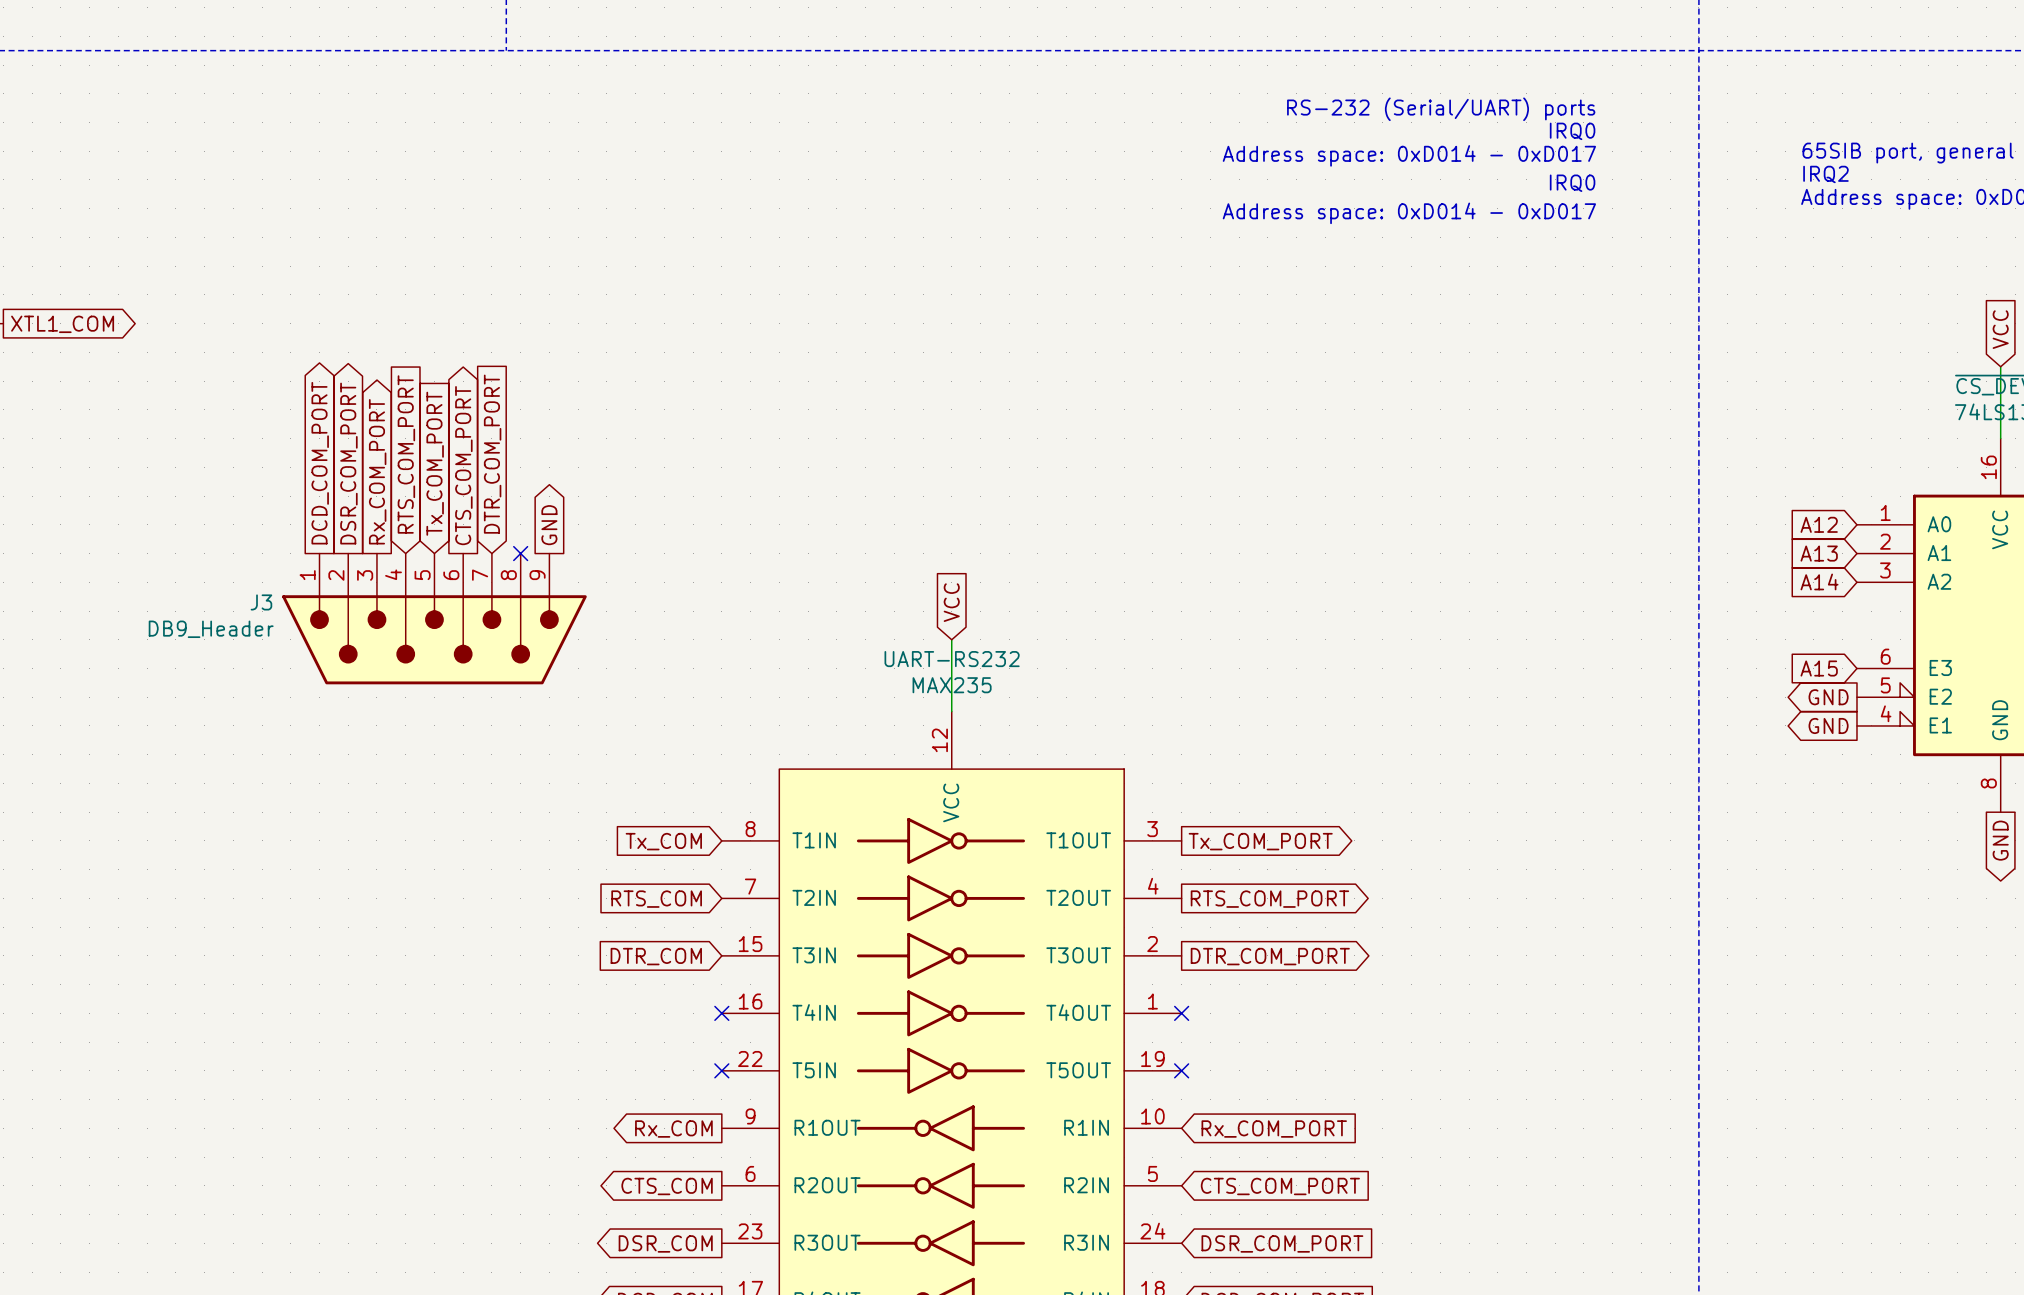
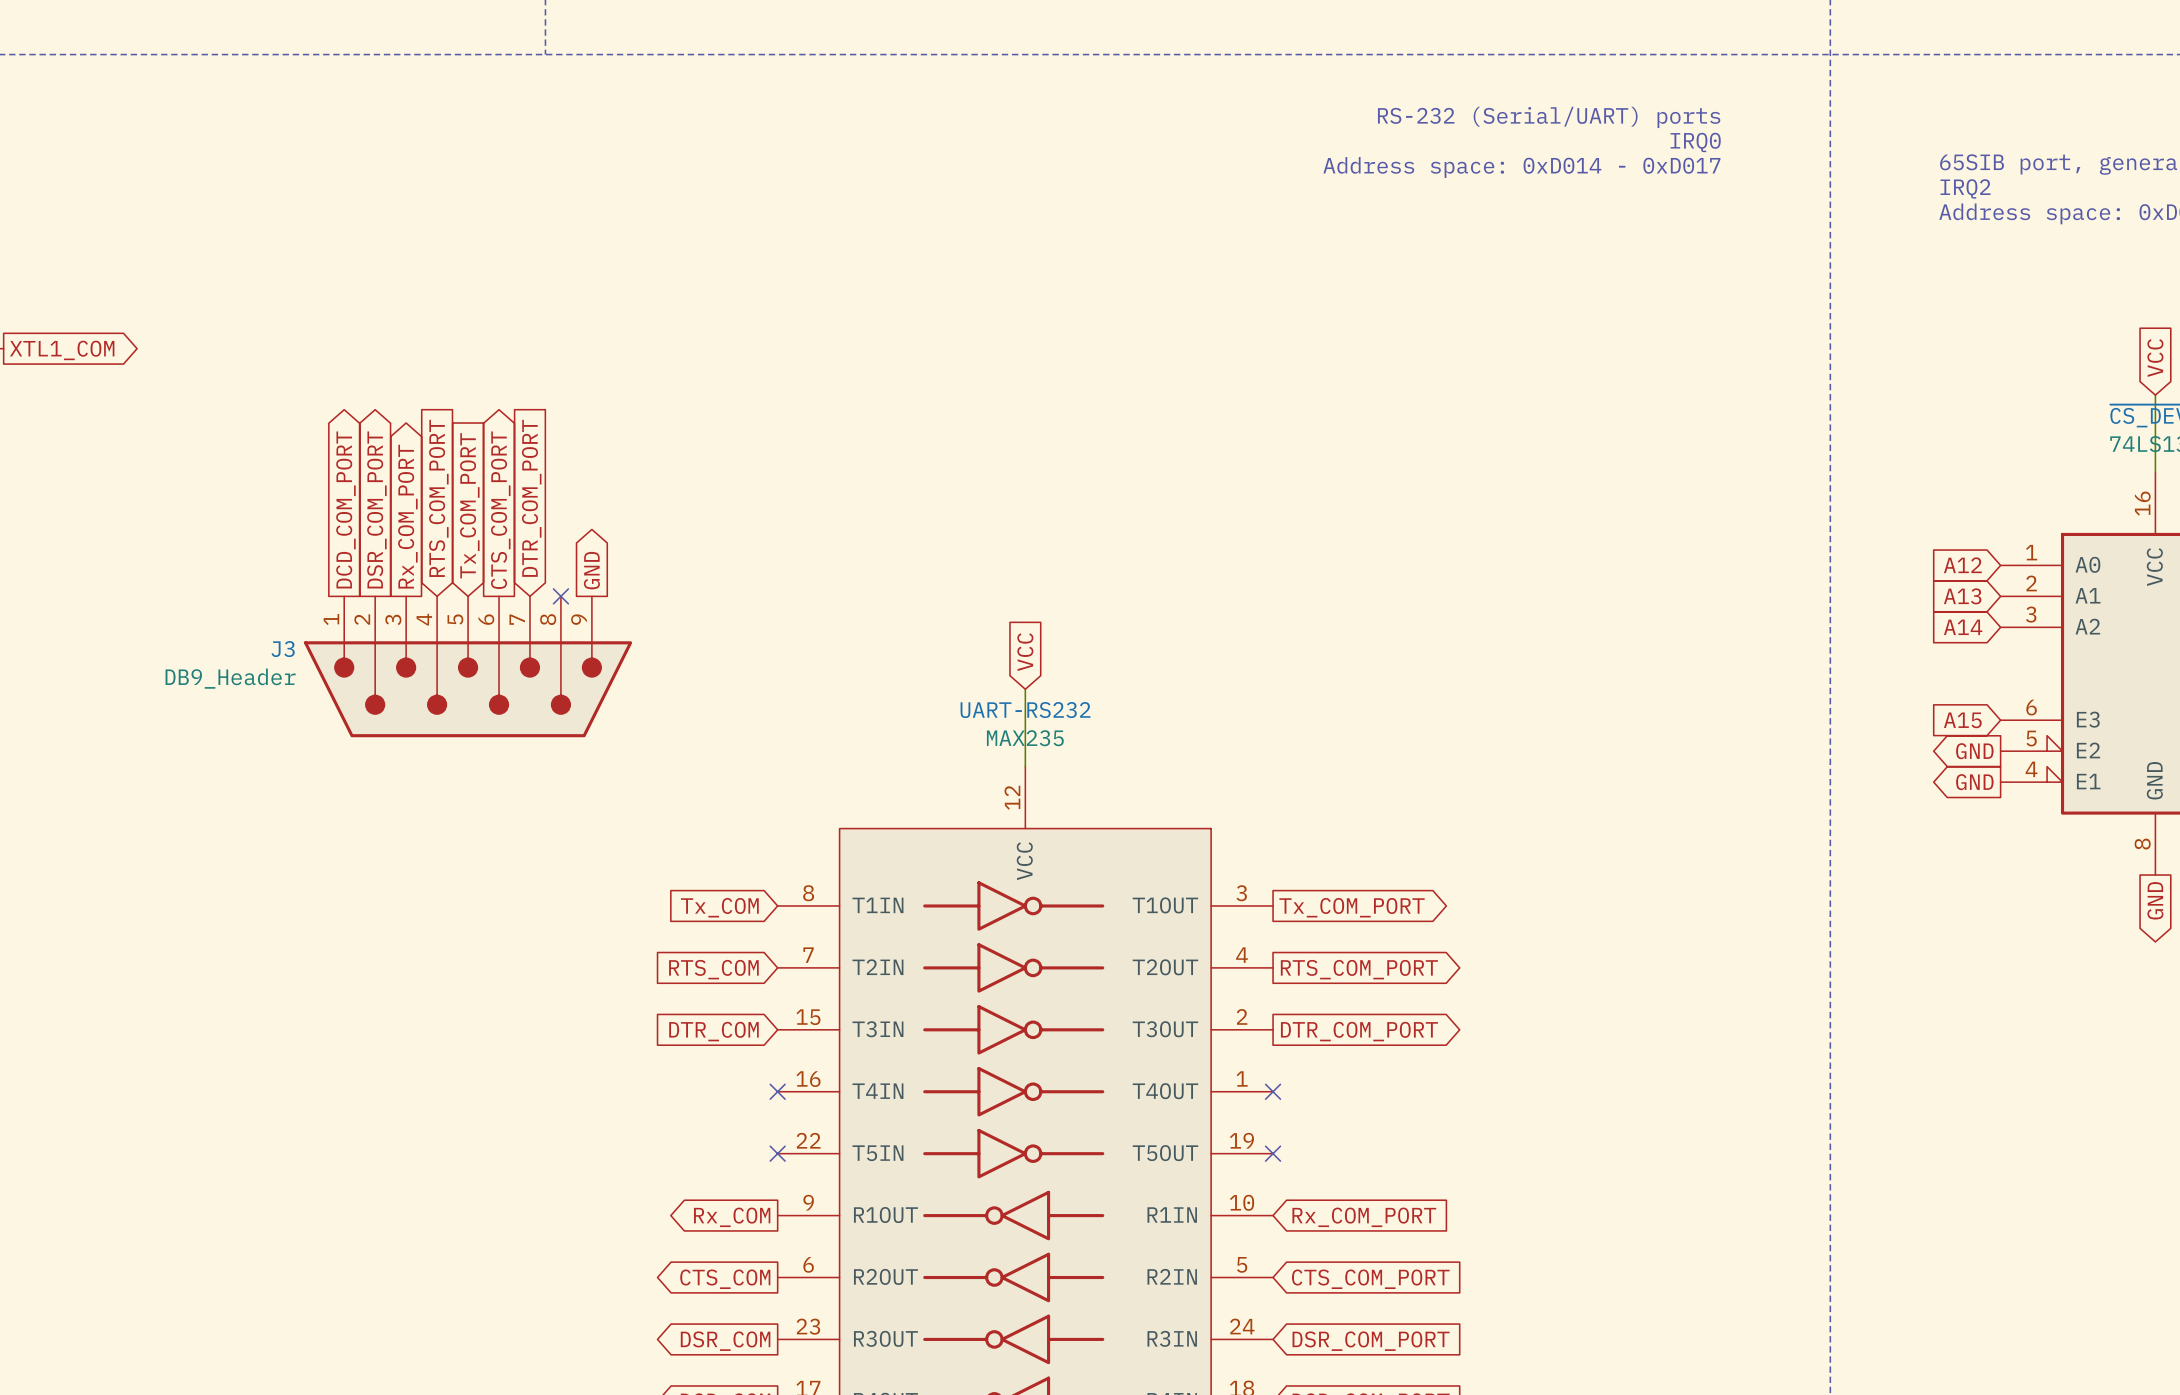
text: IRQ0 (1572, 183) -> none
text: Address space: 0xD014 - 0xD017 (1409, 213) -> none

